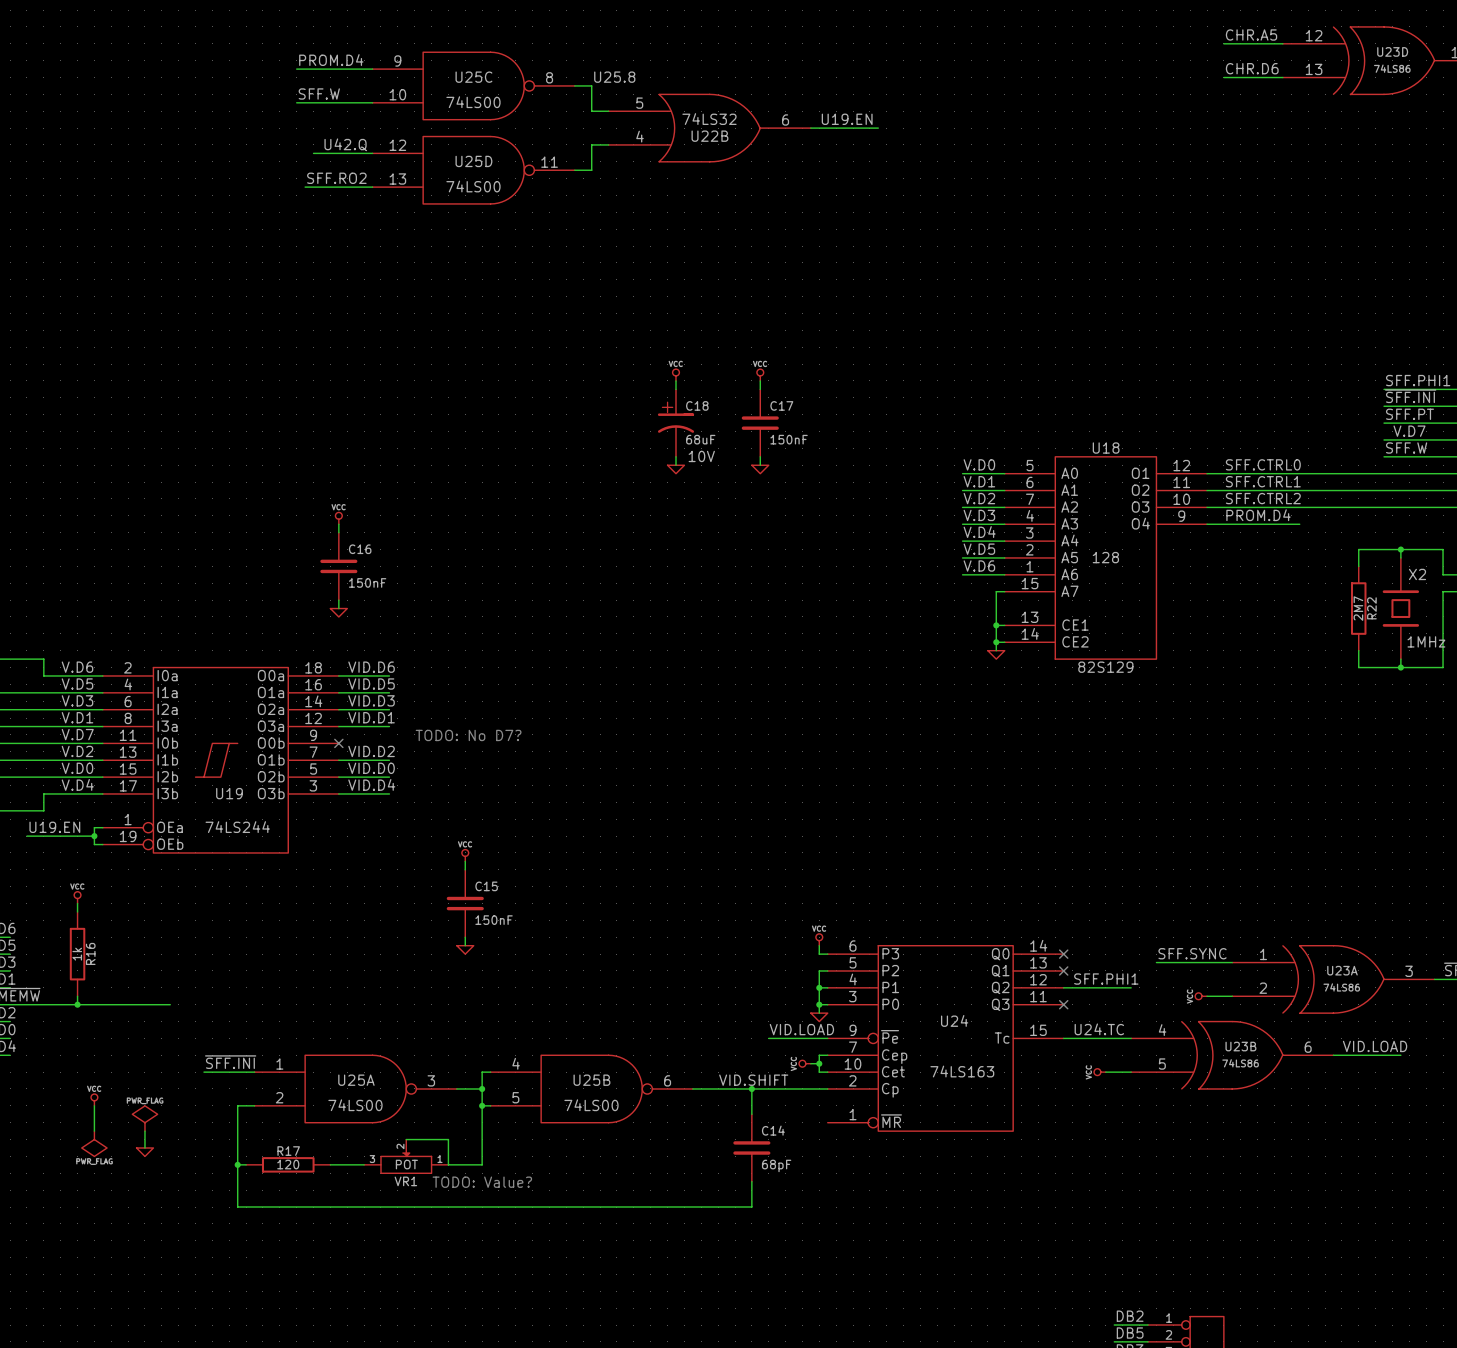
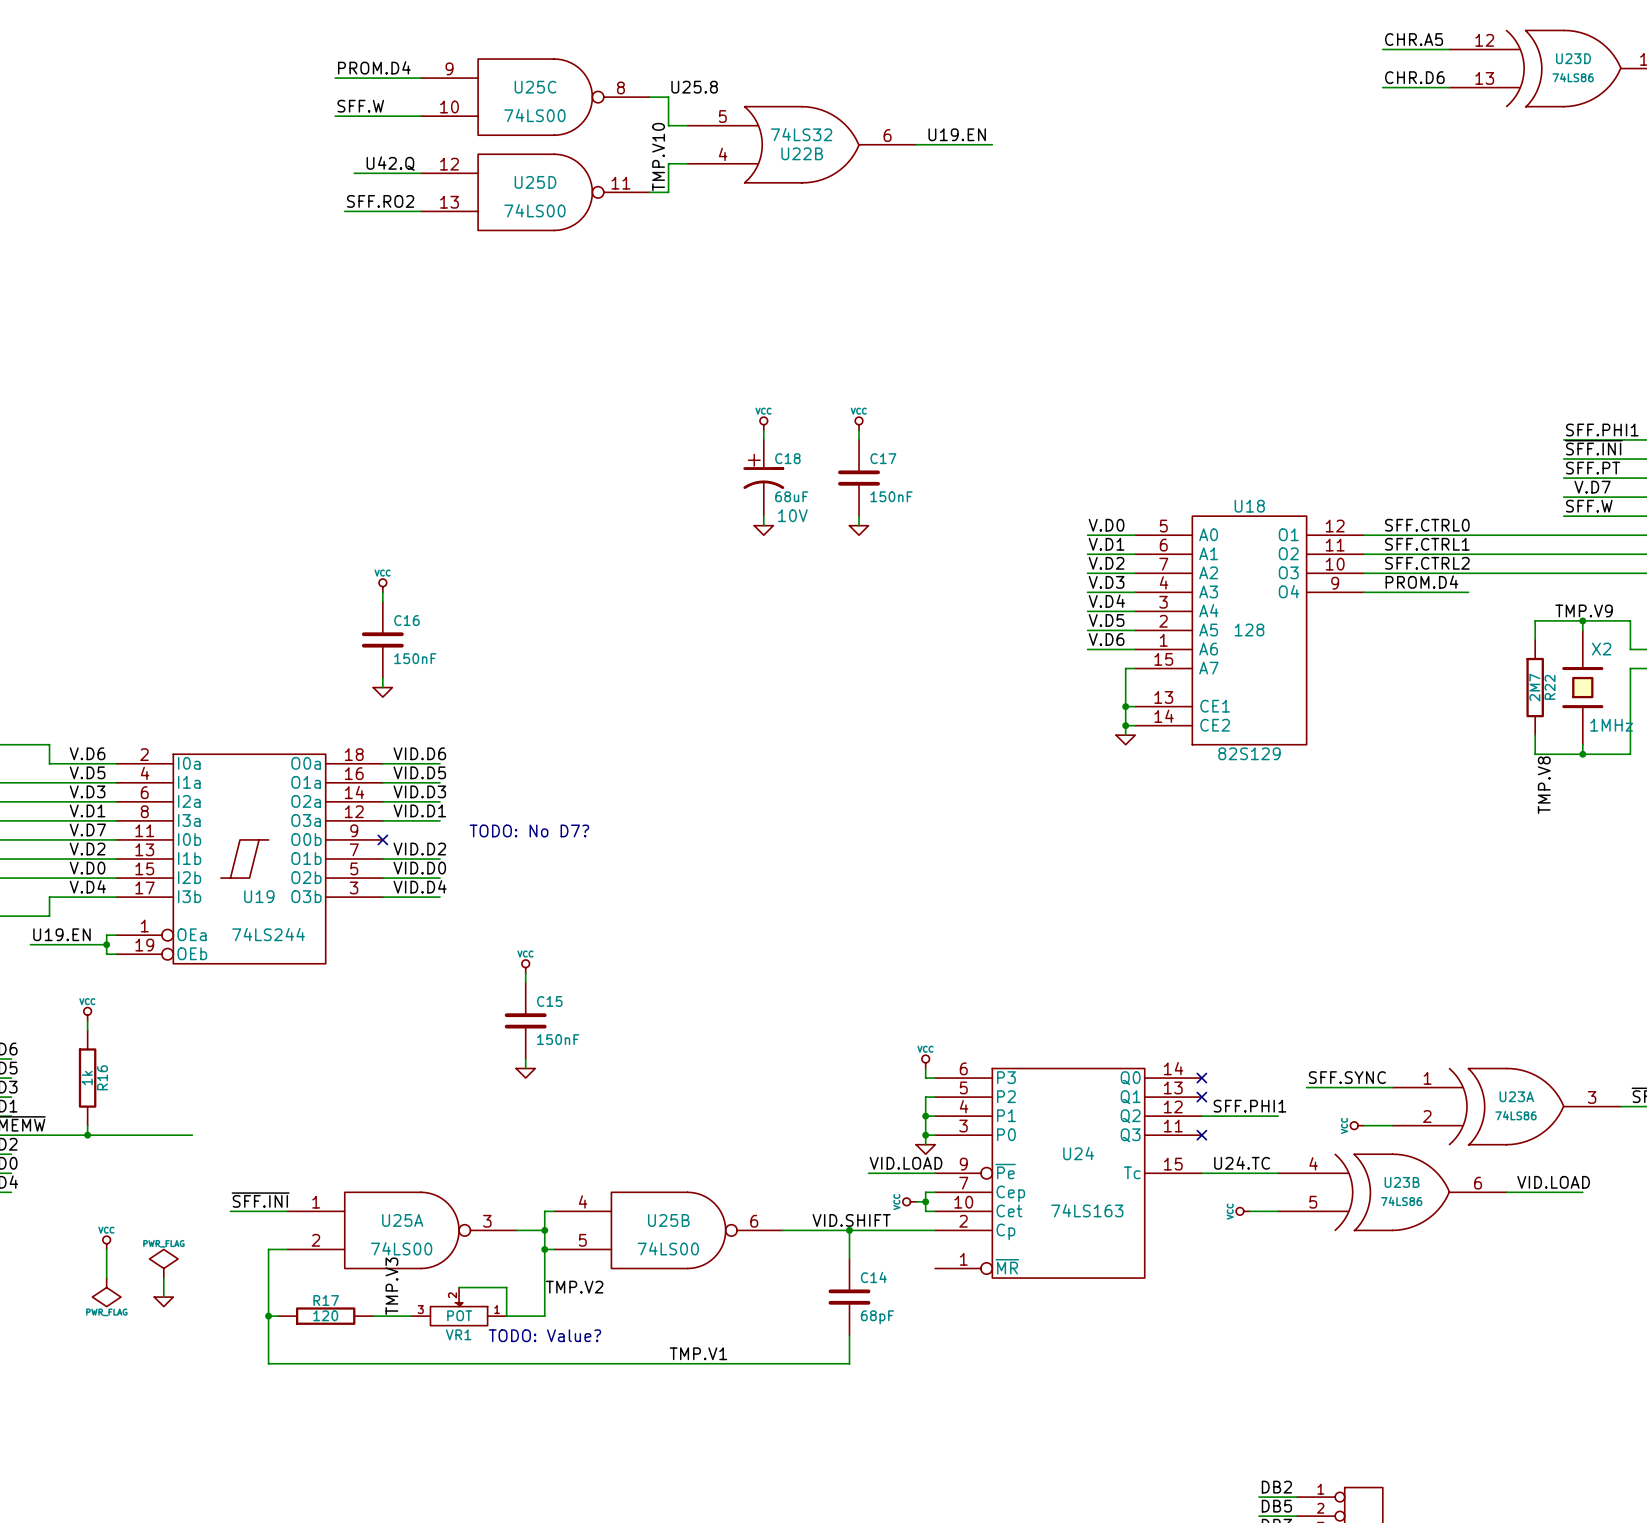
label: none -> TMP.V10 (658, 157)
label: none -> TMP.V9 (1584, 610)
label: none -> TMP.V8 (1544, 785)
label: none -> TMP.V3 (391, 1286)
label: none -> TMP.V2 (574, 1287)
label: none -> TMP.V1 (698, 1353)

